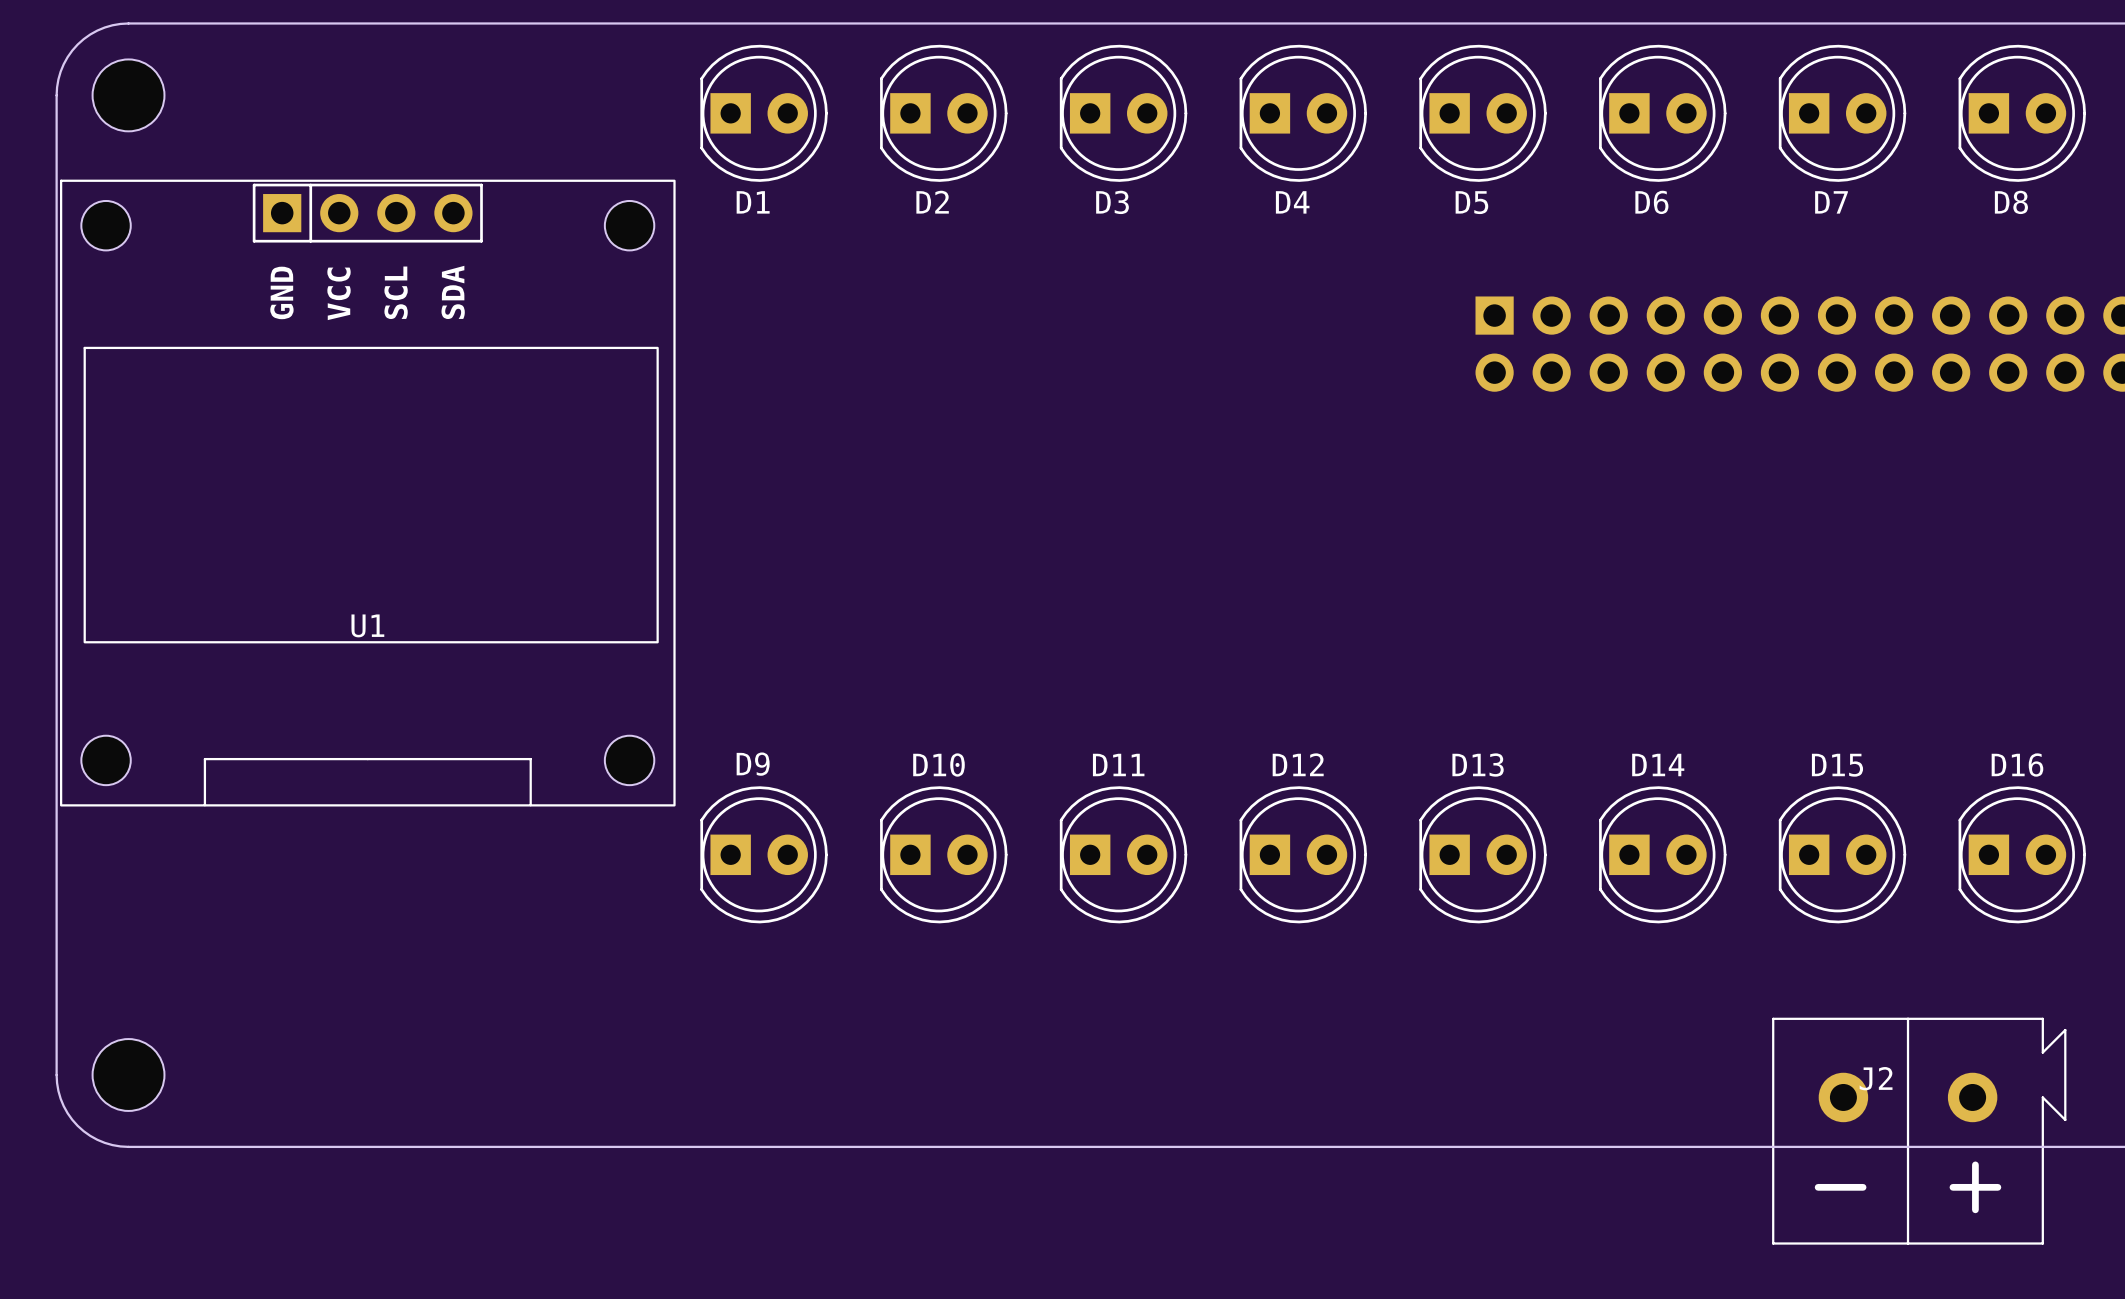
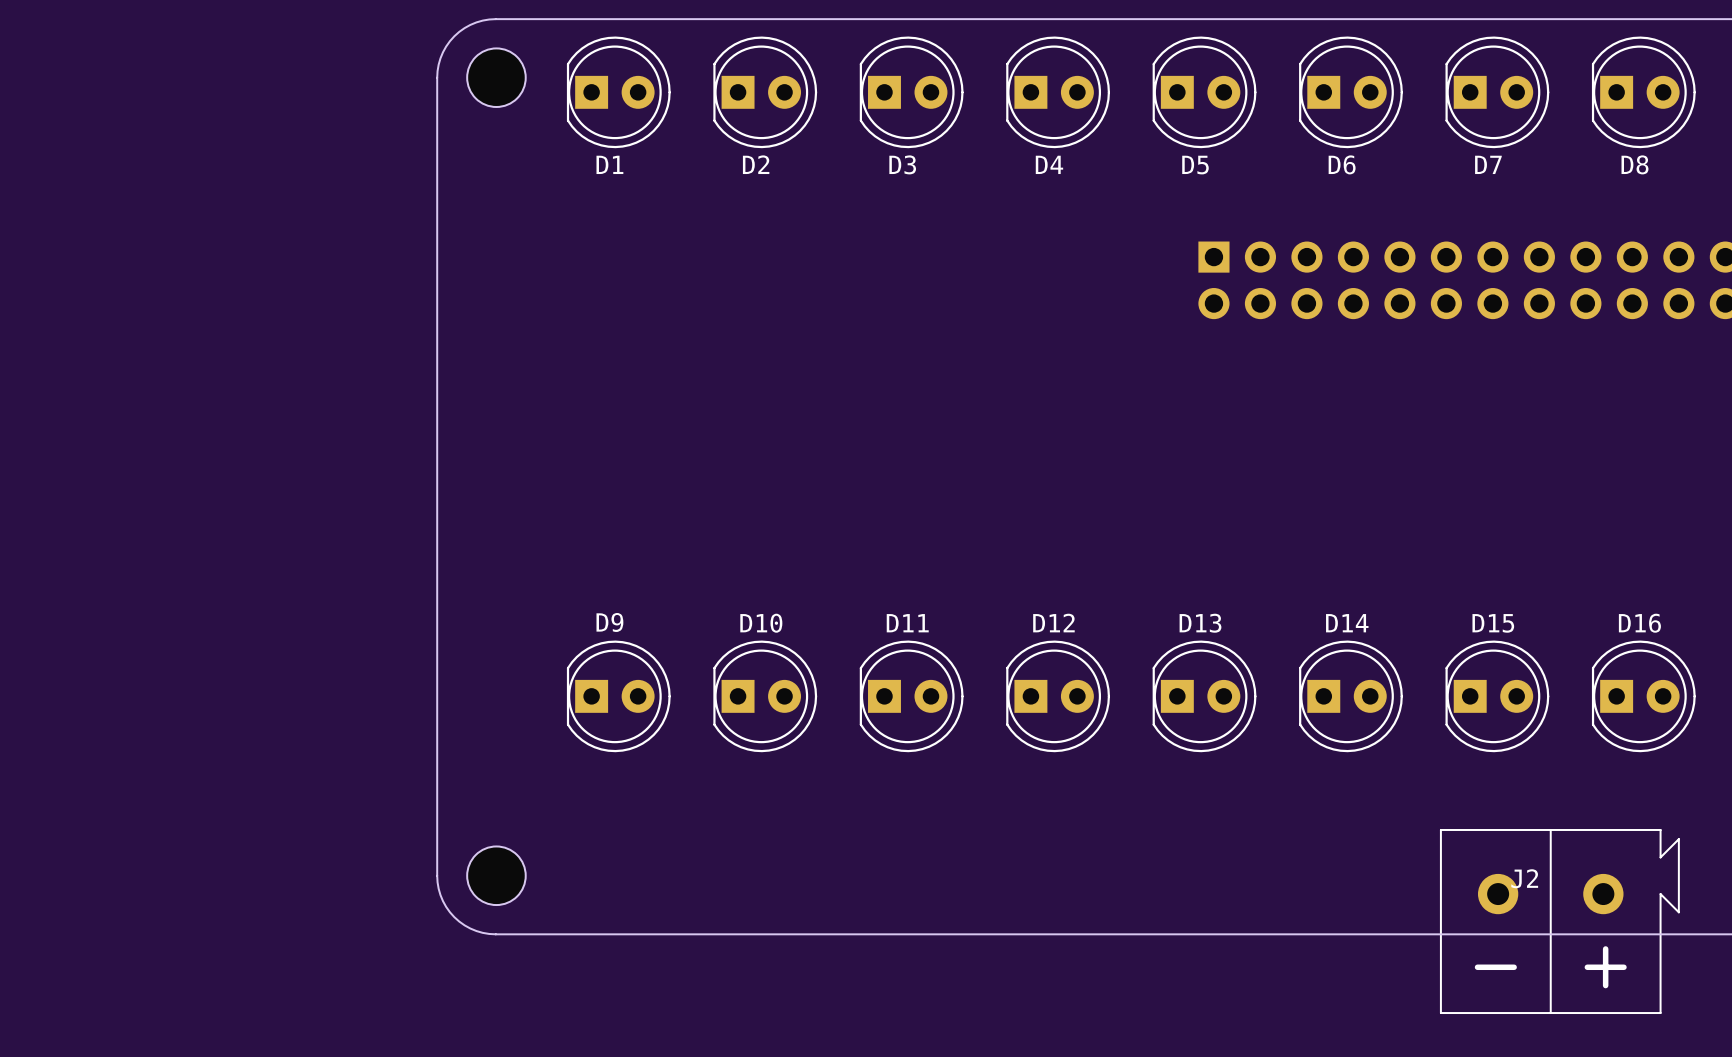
board edge: (613, 23) (120, 23) (97, 30) (77, 44) (63, 64) (58, 79) (56, 95) (56, 1075) (58, 1091) (63, 1106) (77, 1125) (90, 1135) (104, 1142) (120, 1146) (613, 1146) -> (495, 19) (476, 22) (454, 36) (440, 58) (437, 77) (437, 882) (442, 901) (454, 917) (470, 928) (495, 934)
part position: (128, 95) -> (496, 77)
U1: (367, 493) -> none
part position: (128, 1075) -> (496, 875)

